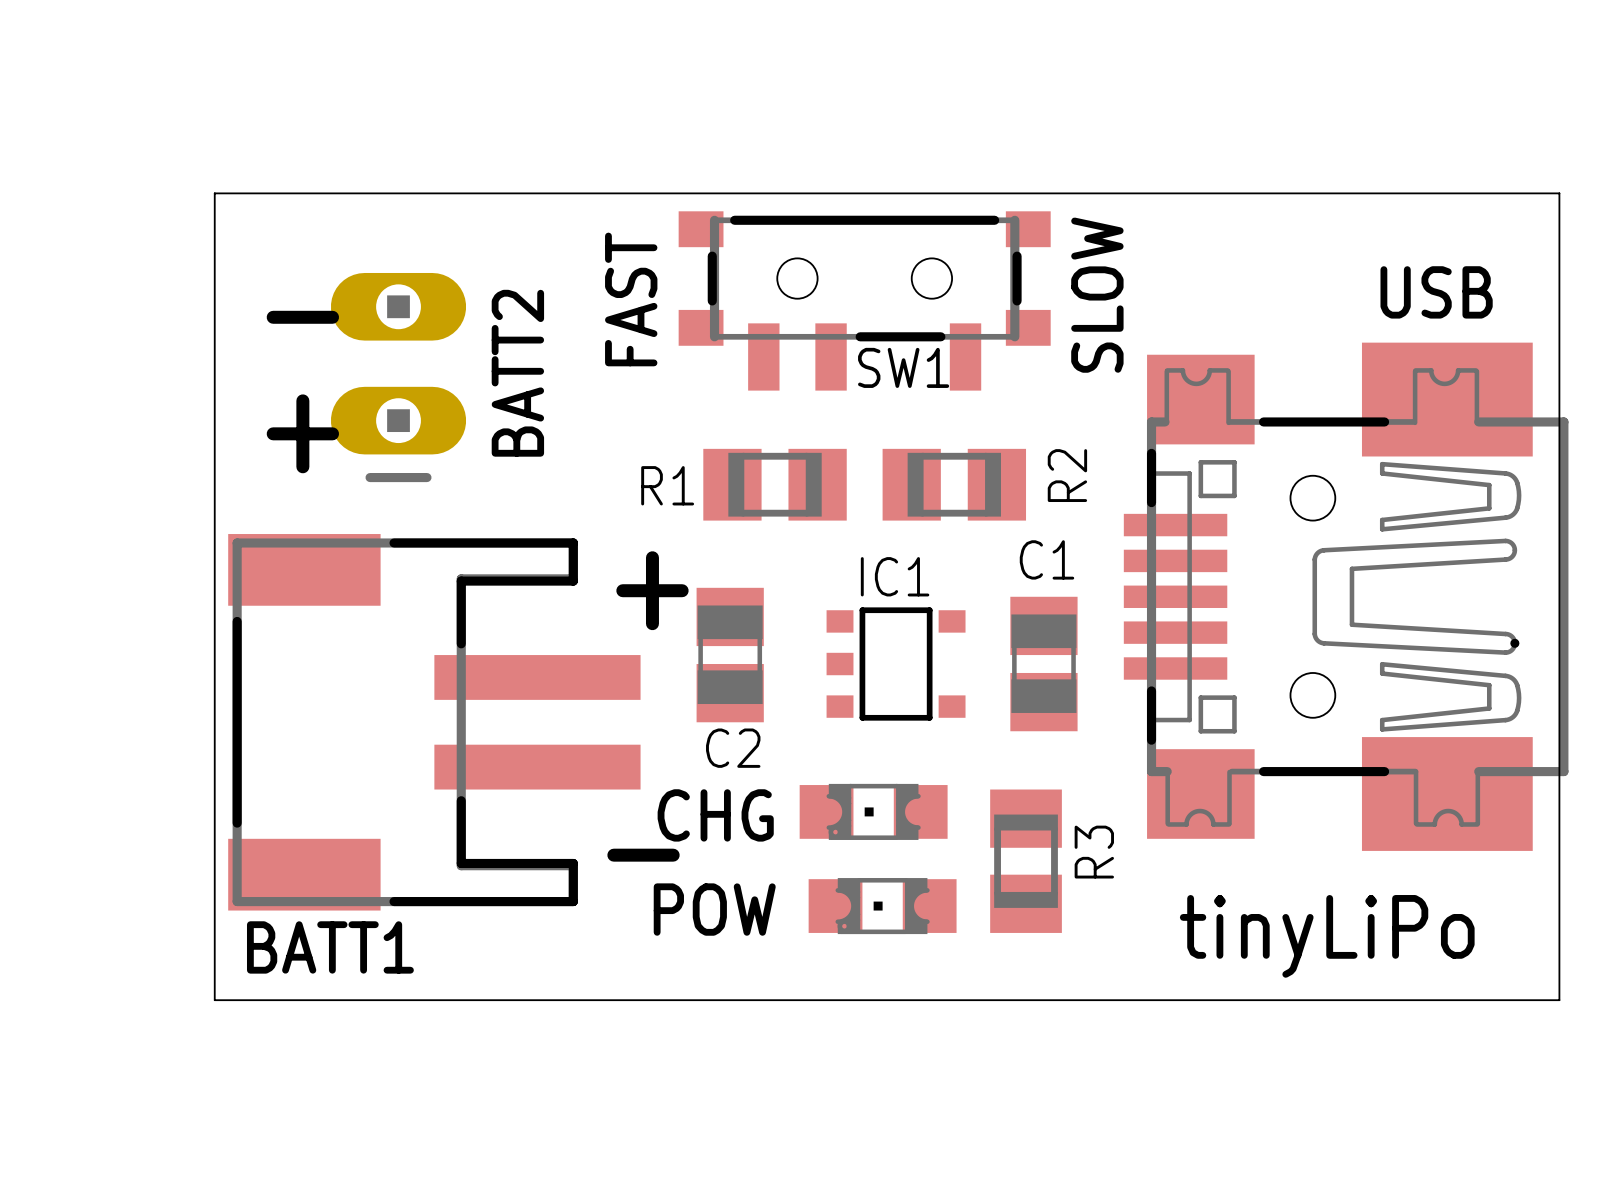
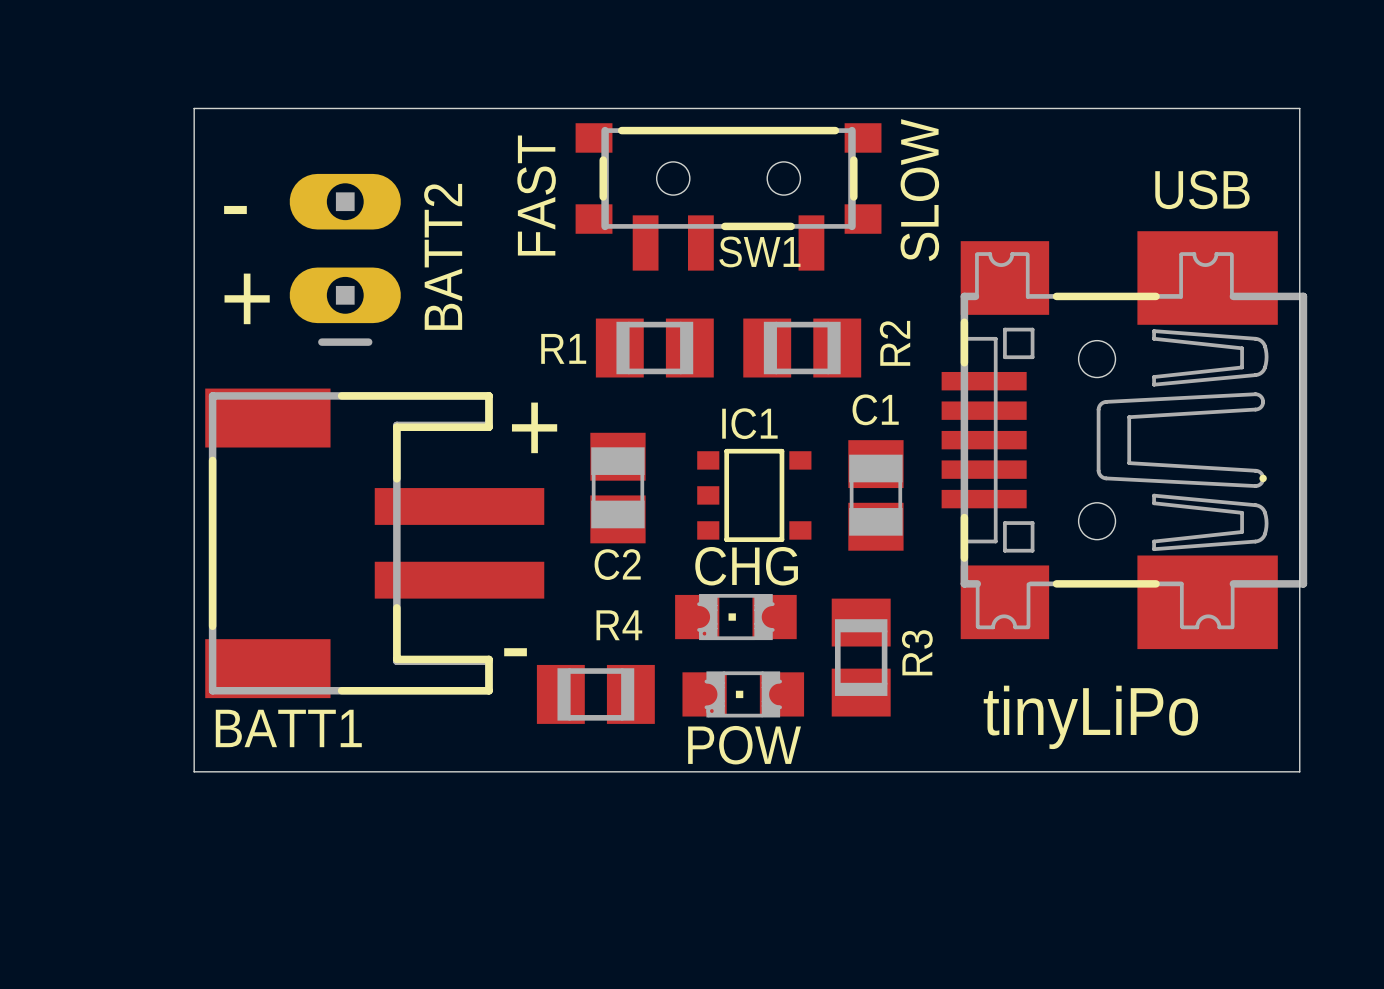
CHG name position: CHG (715, 815) -> CHG (746, 566)
R4: none -> (595, 694)
POW name position: POW (714, 909) -> POW (744, 745)

